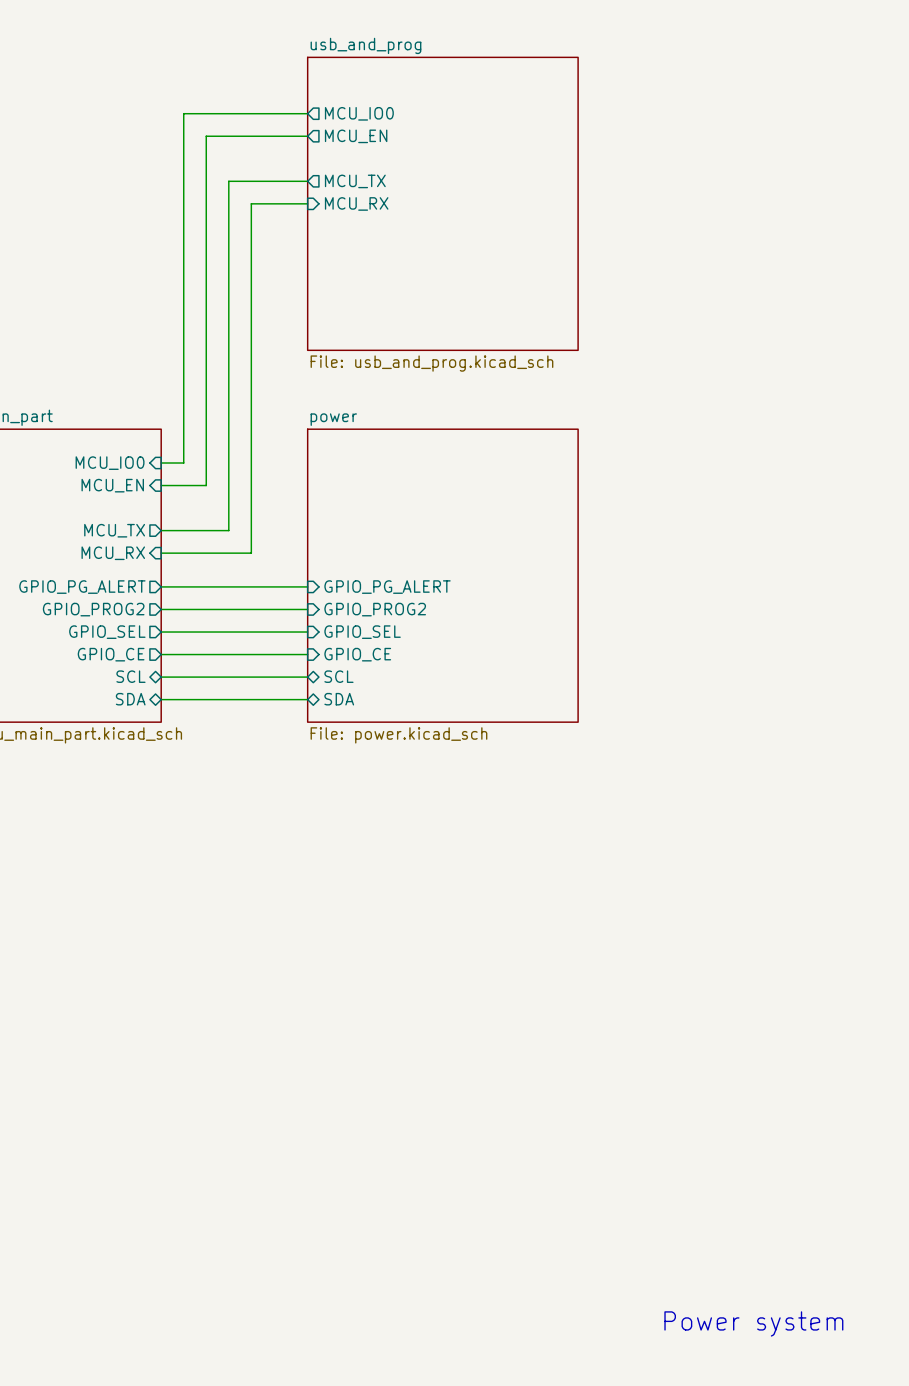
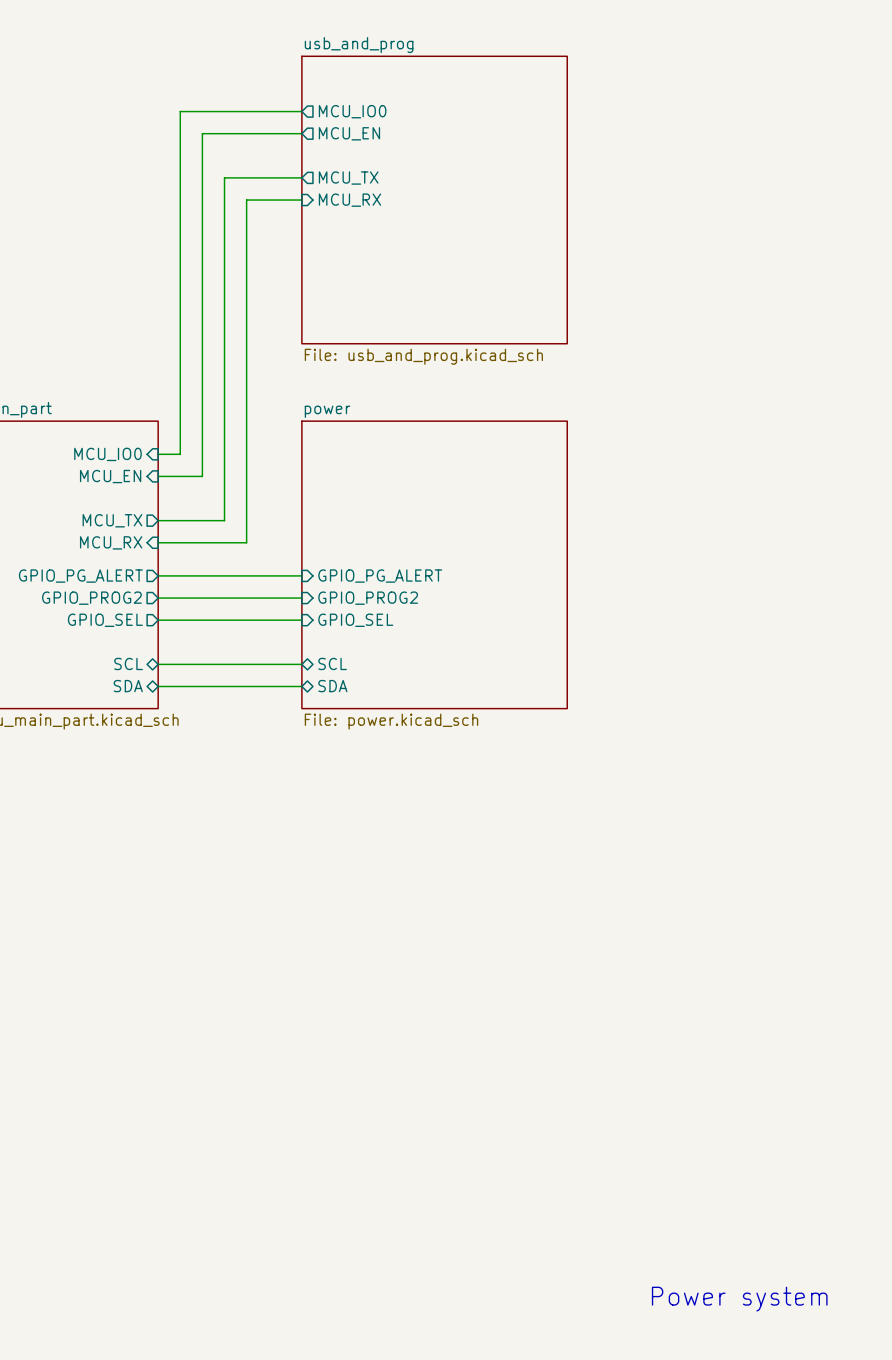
sheet pin: GPIO_CE (111, 654) -> none
wire: (161, 654) (307, 654) -> none
sheet pin: GPIO_CE (357, 654) -> none

